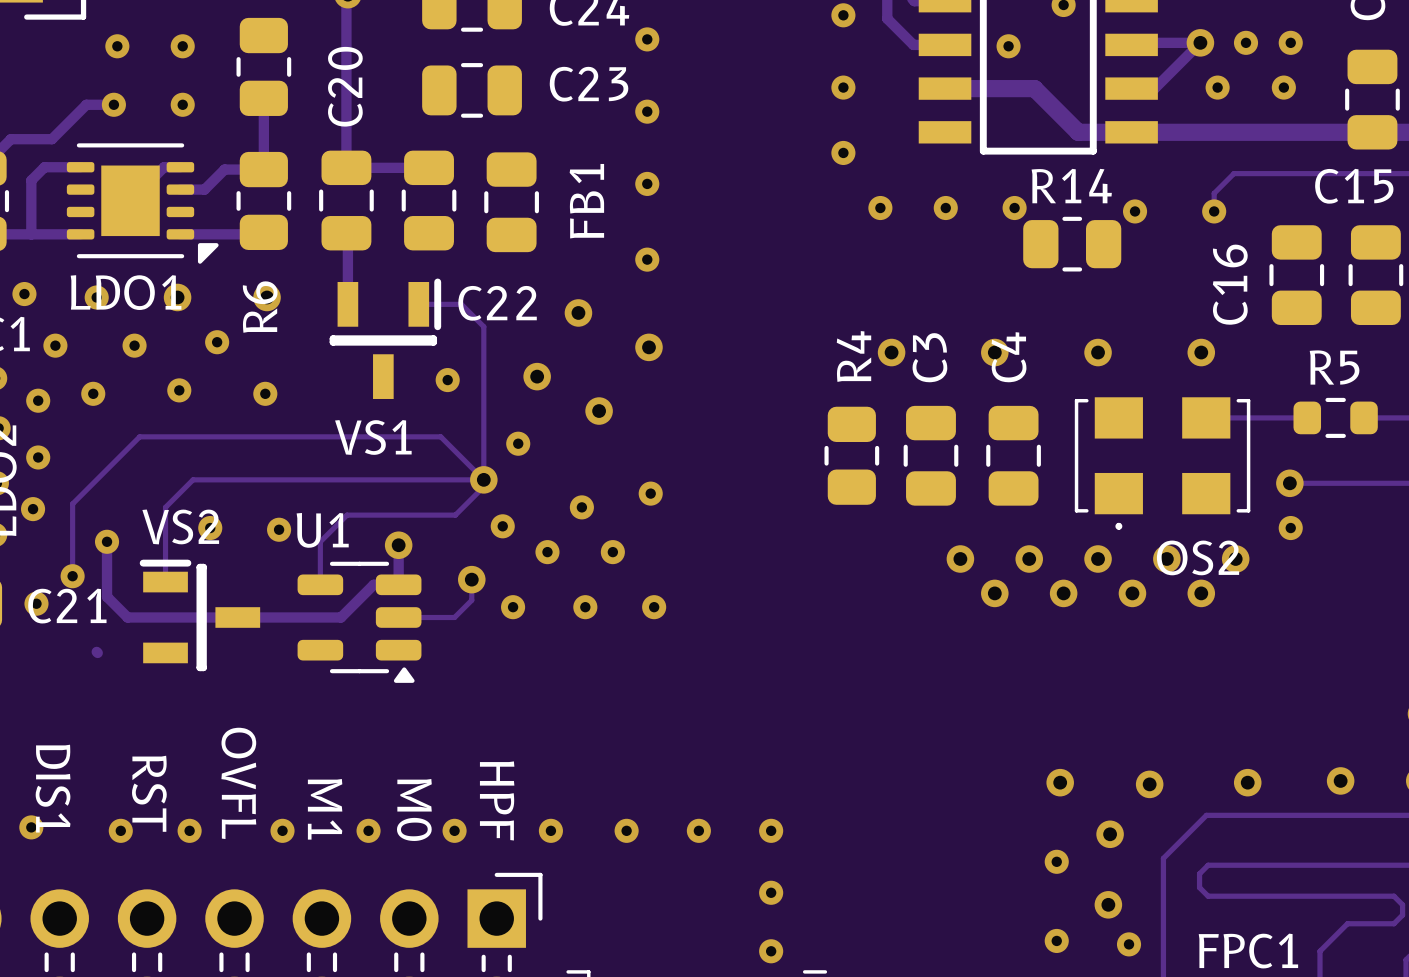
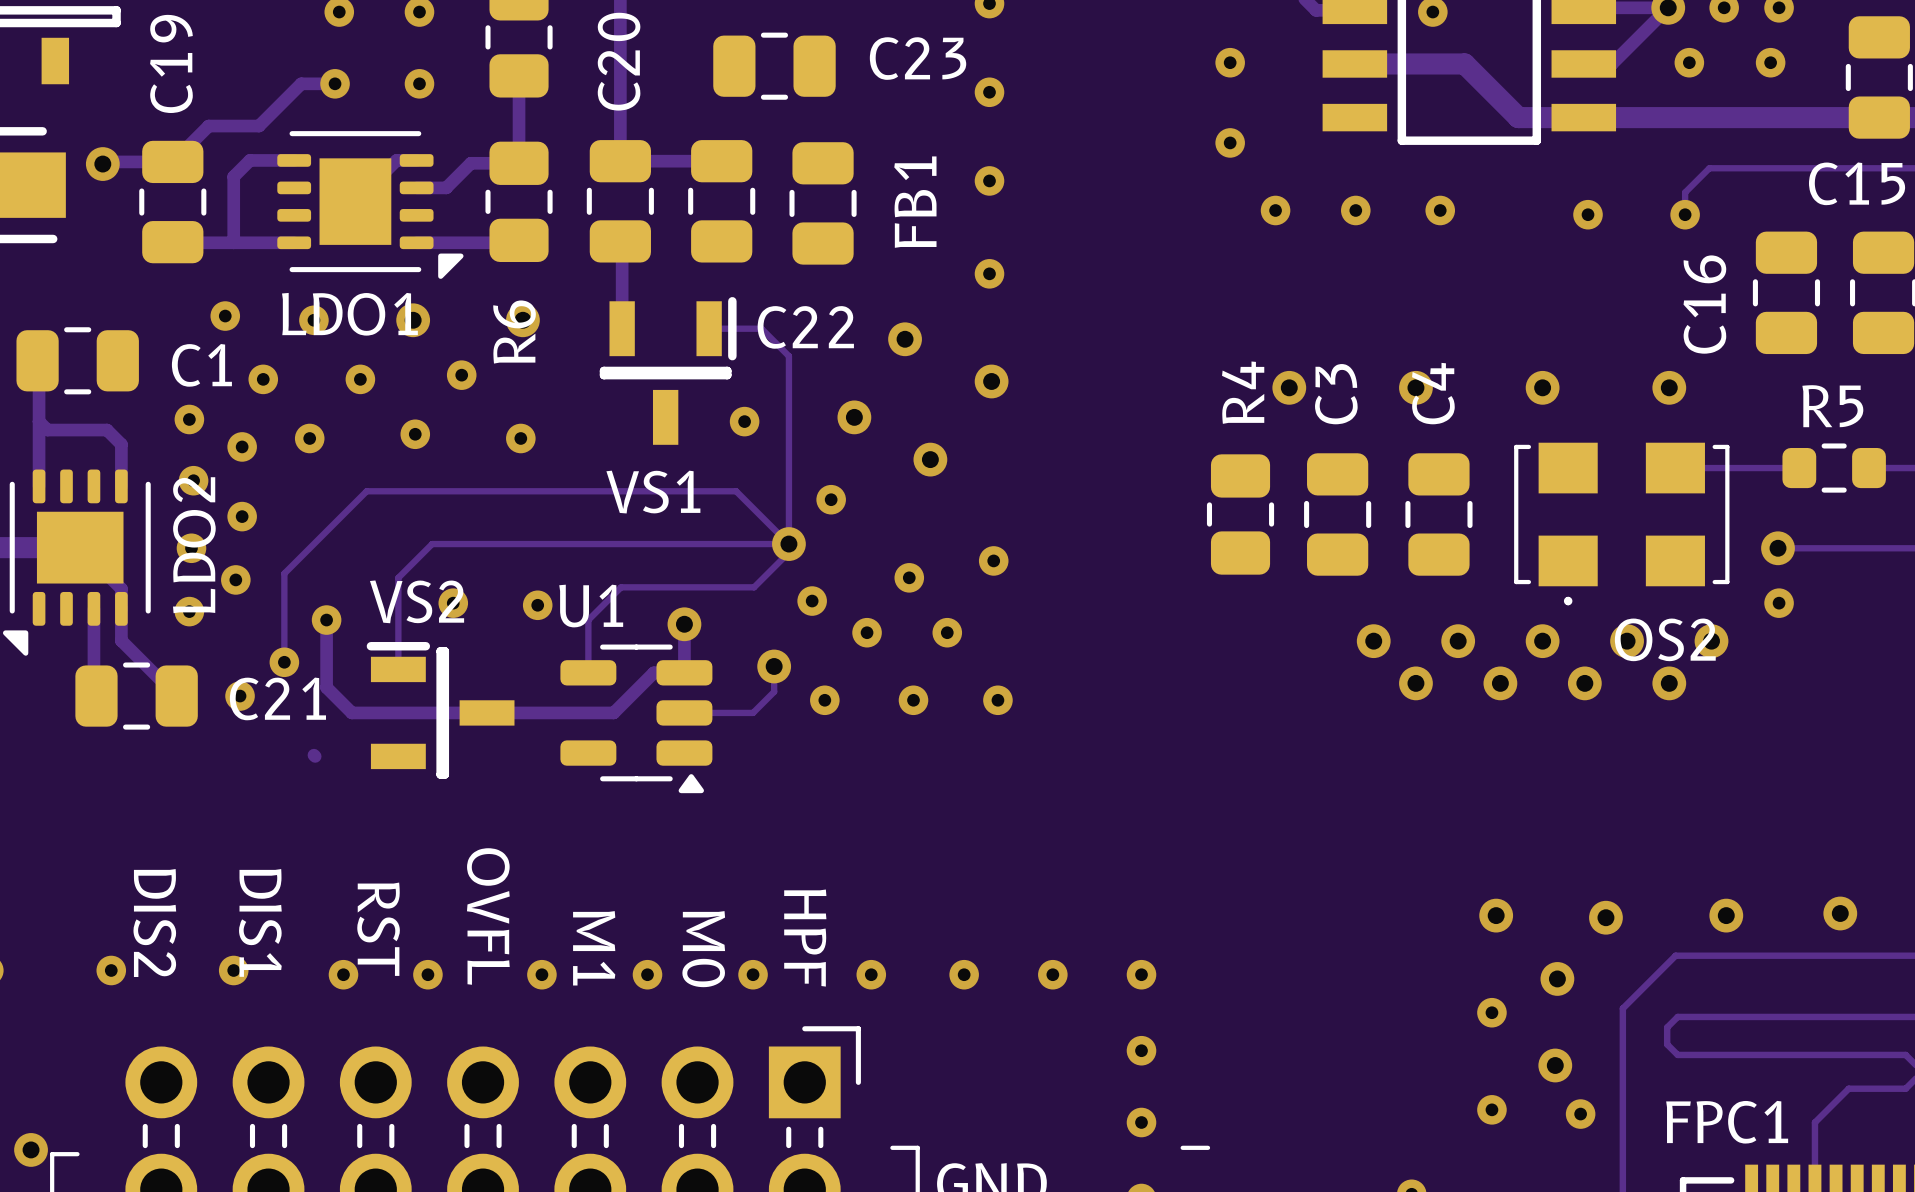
R14: (1072, 244) -> none

